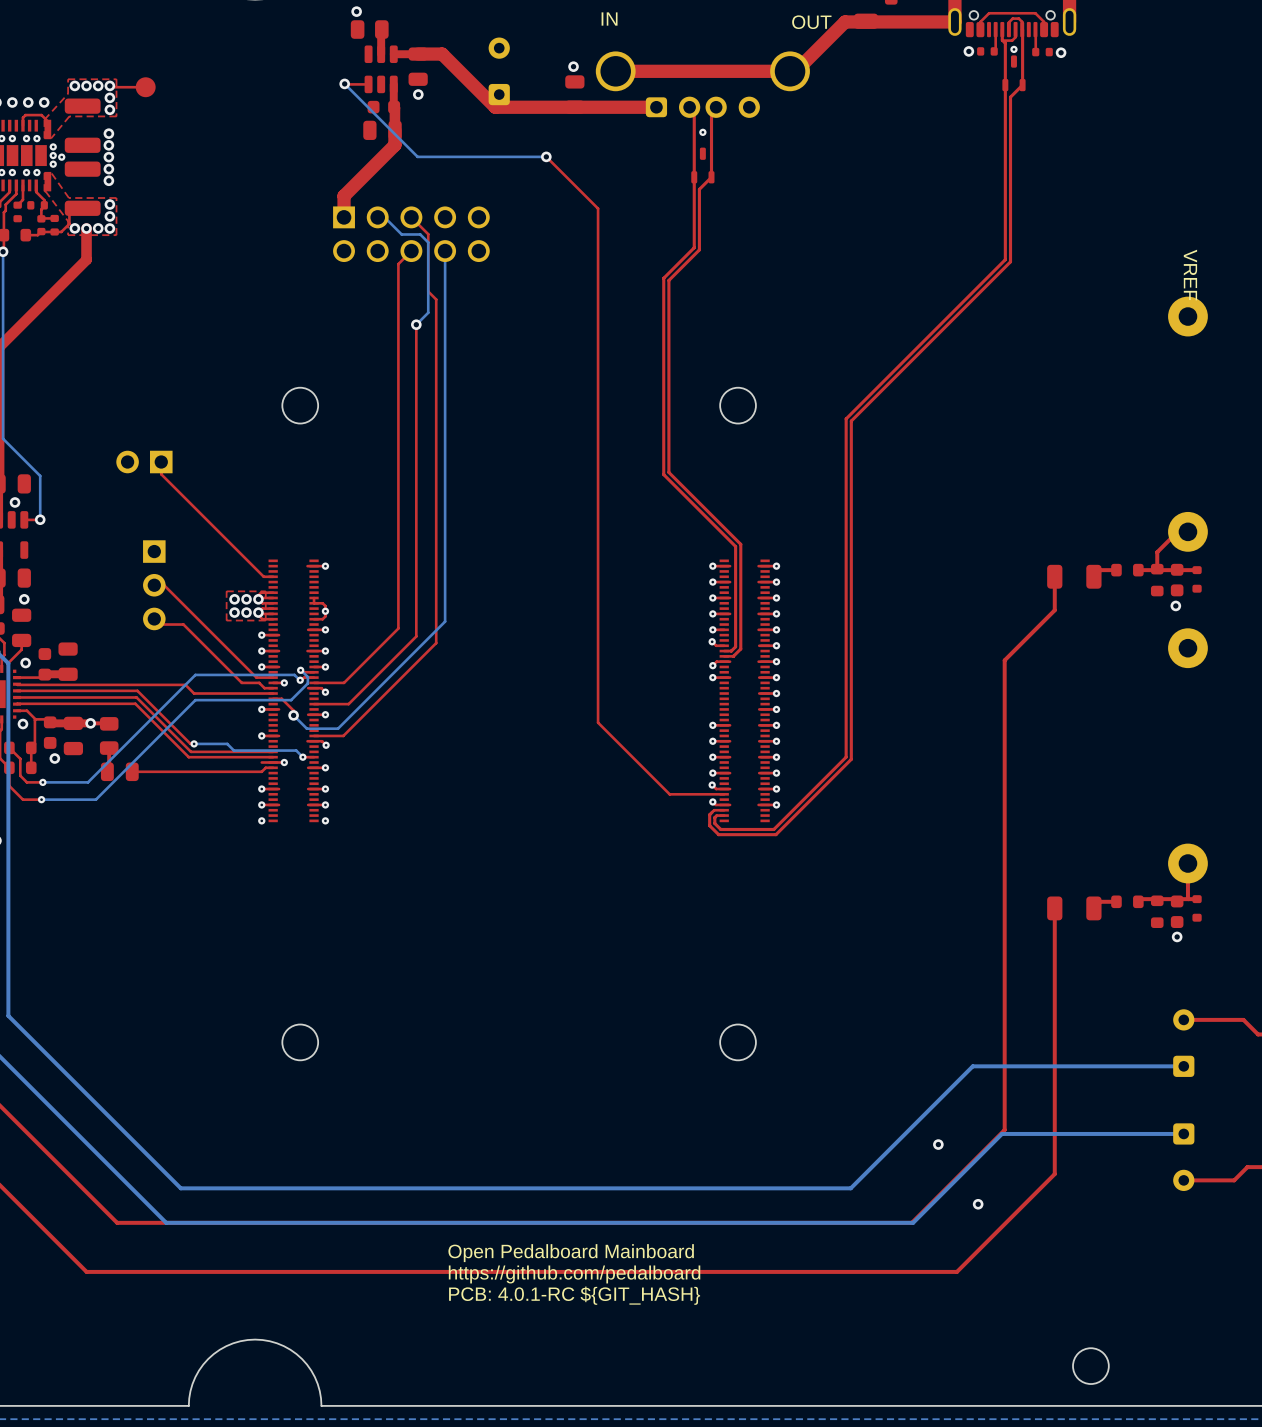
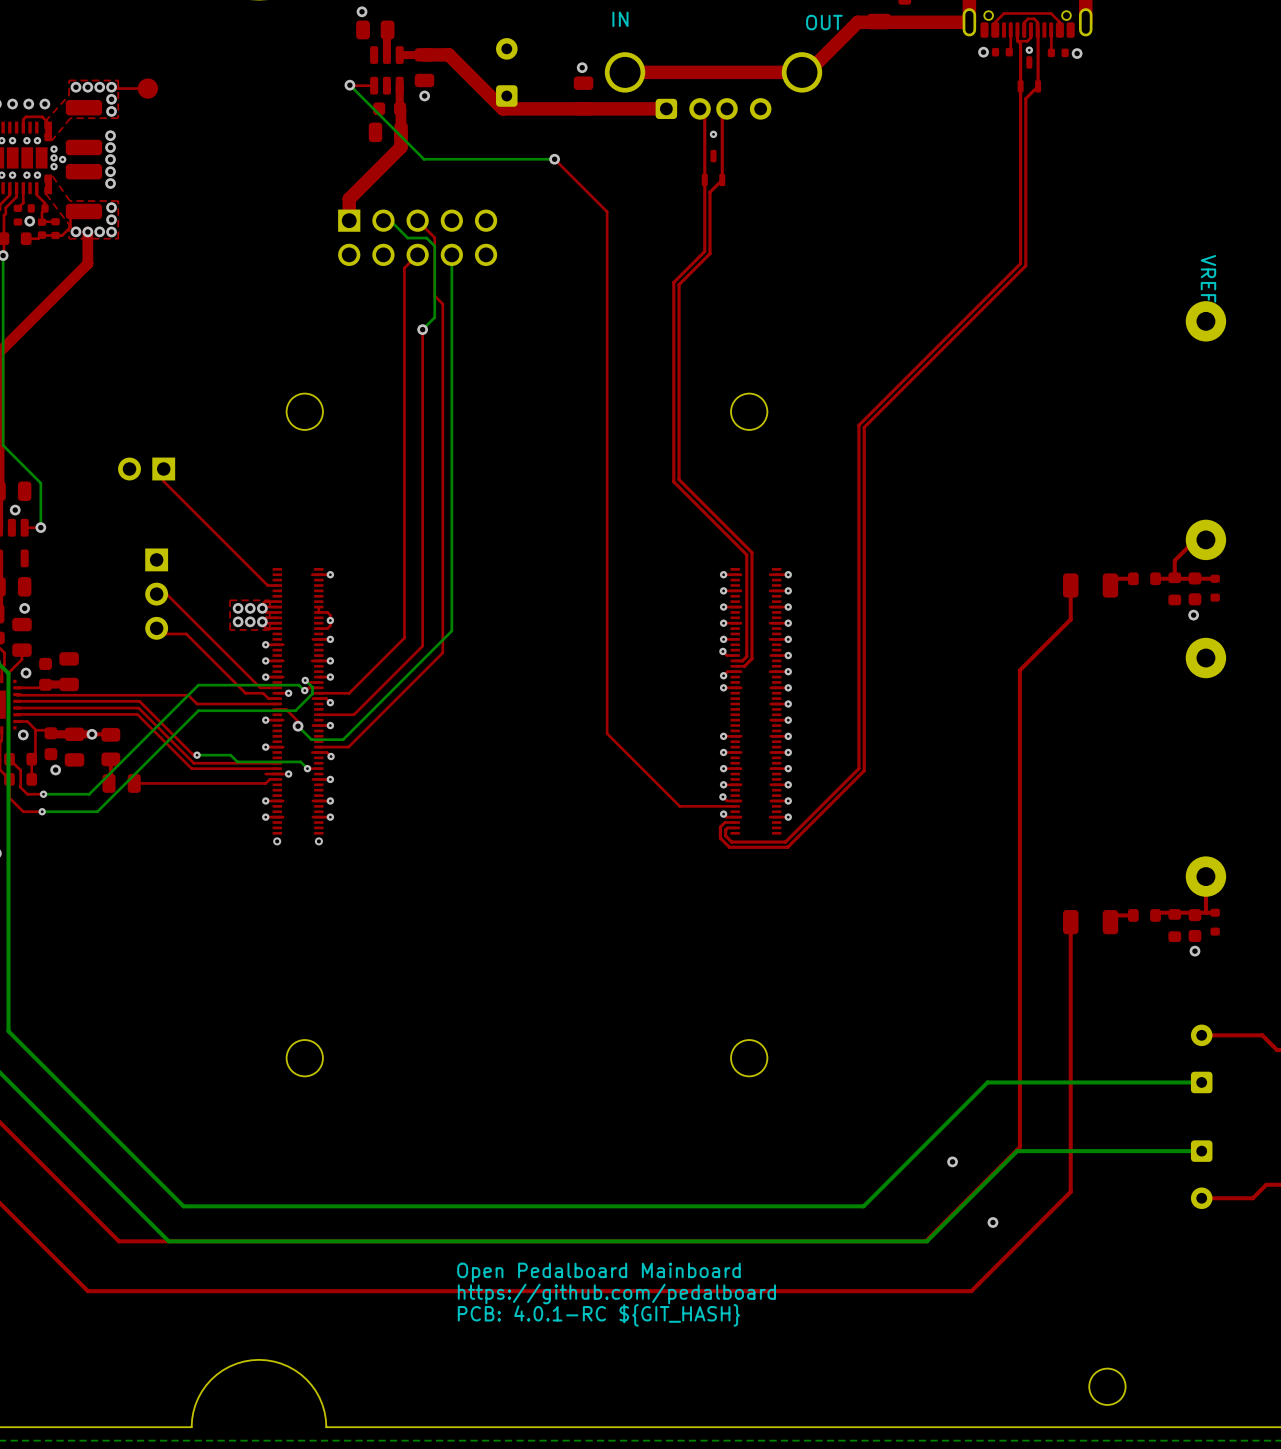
via: none -> (29, 221)
via: (261, 820) -> none
via: (325, 820) -> none
via: none -> (277, 841)
via: none -> (318, 841)

